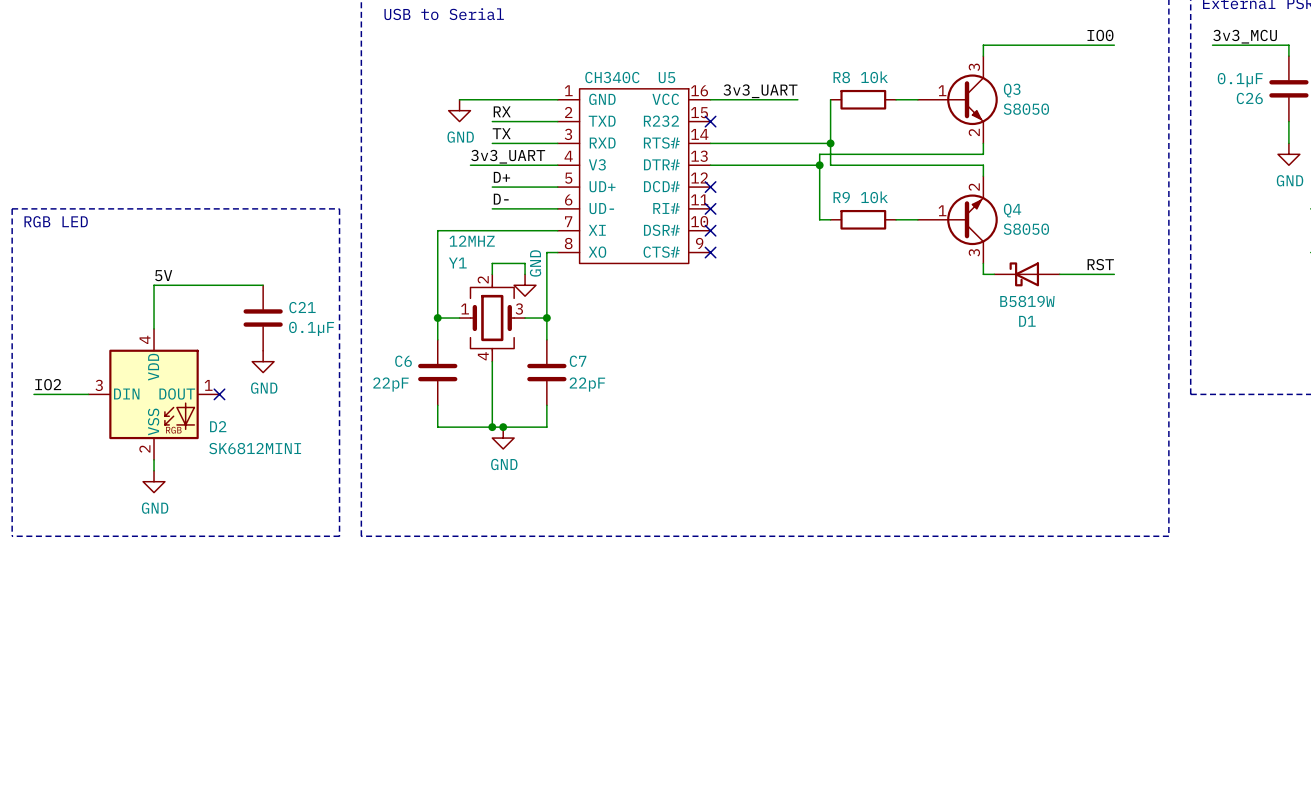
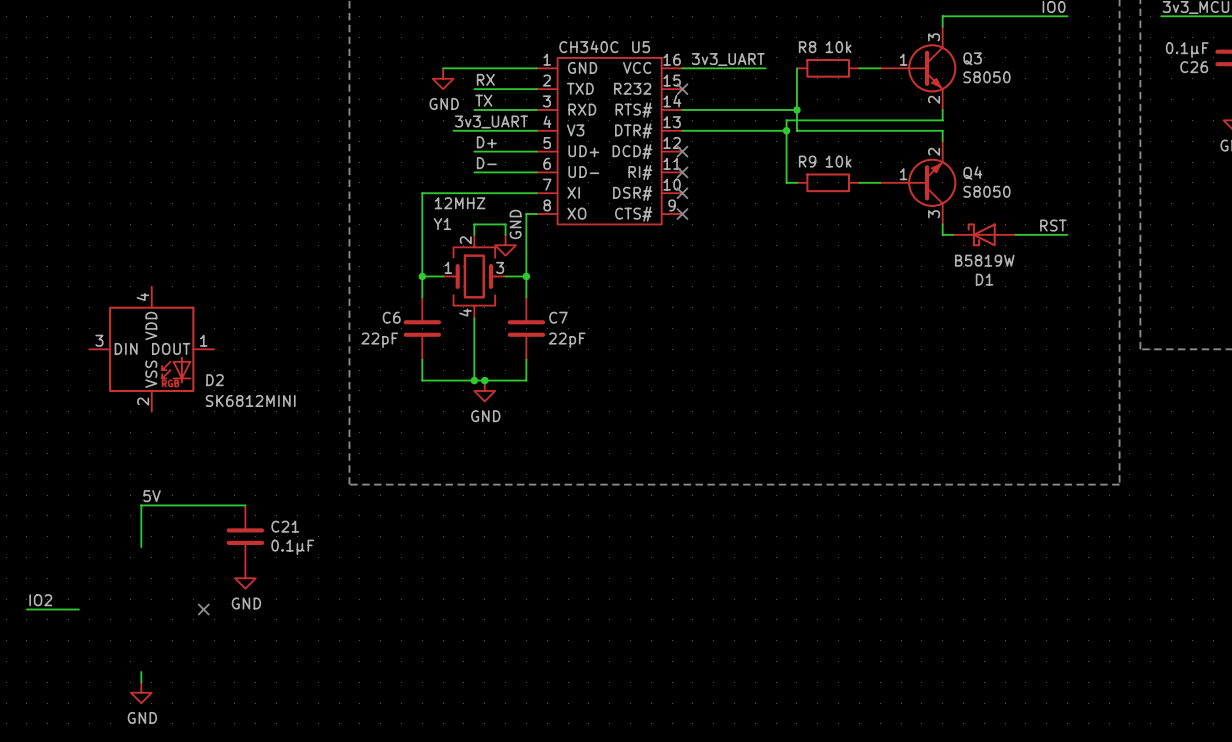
line: (12, 208) (339, 208) (339, 536) (12, 536) (12, 208) -> none
text: RGB LED (56, 221) -> none
label: 5V (163, 275) -> none
wire: (263, 285) (154, 285) (154, 328) -> none
C21 position: (263, 318) -> (245, 536)
power symbol: GND (263, 361) -> none
label: IO2 (48, 384) -> none
wire: (33, 394) (88, 394) -> none
no-connect mark: (219, 394) -> none
wire: (154, 459) (154, 470) -> none
power symbol: GND (154, 481) -> none
label: none -> 5V (152, 496)
wire: none -> (245, 505) (141, 505) (141, 547)
power symbol: none -> GND (245, 578)
label: none -> IO2 (40, 600)
wire: none -> (26, 609) (78, 609)
no-connect mark: none -> (203, 609)
wire: none -> (141, 671) (141, 682)
power symbol: none -> GND (141, 692)

